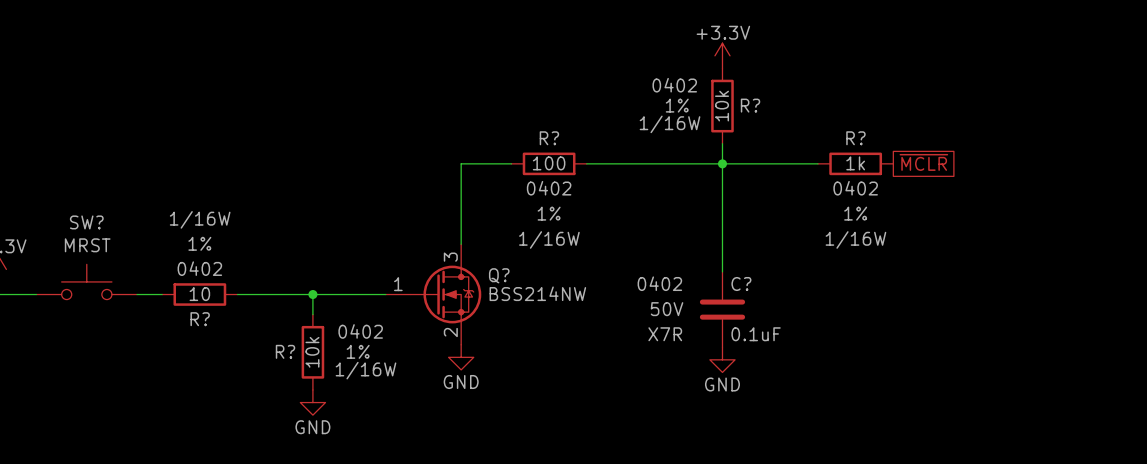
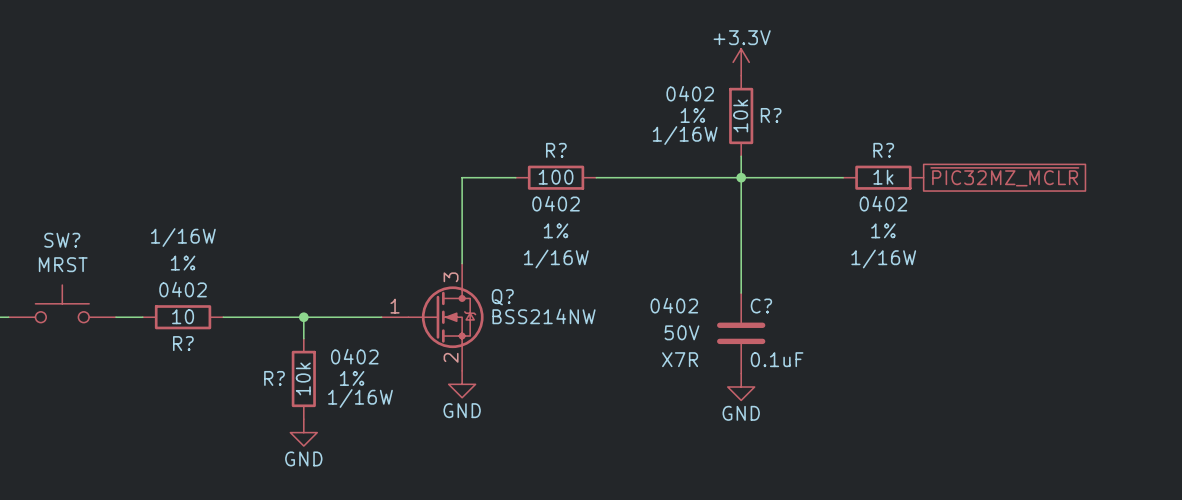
global label: ~{MCLR} (923, 162) -> ~{PIC32MZ_MCLR} (1004, 176)

